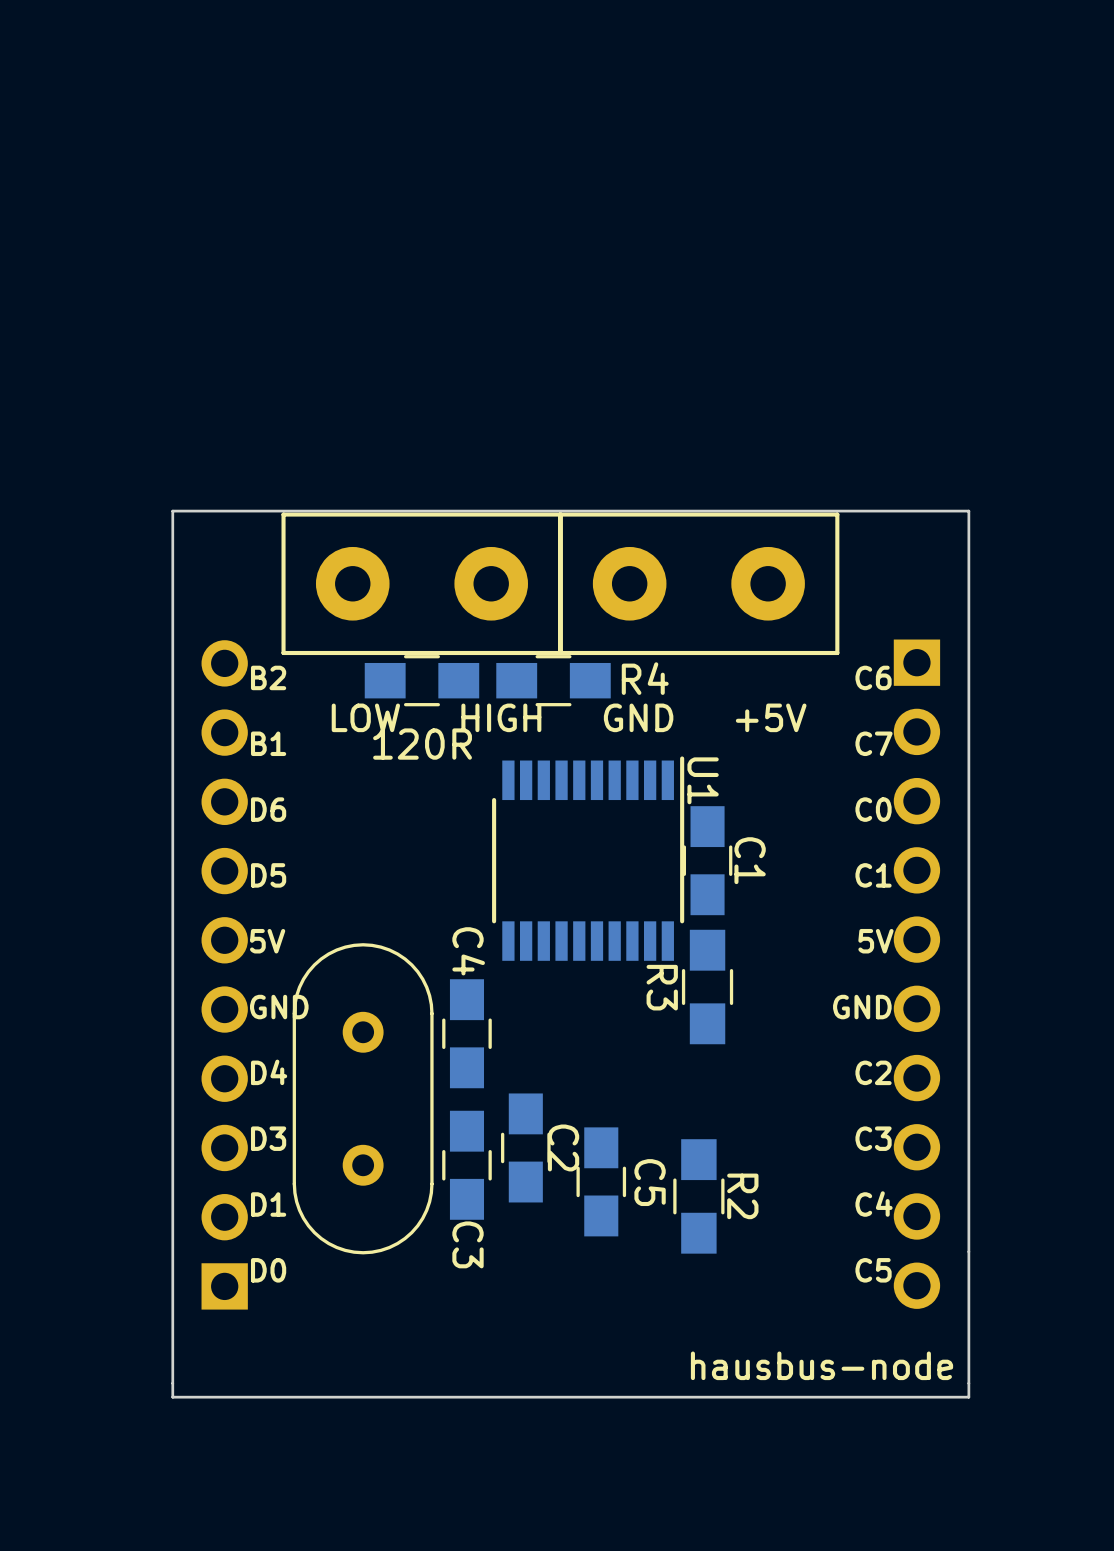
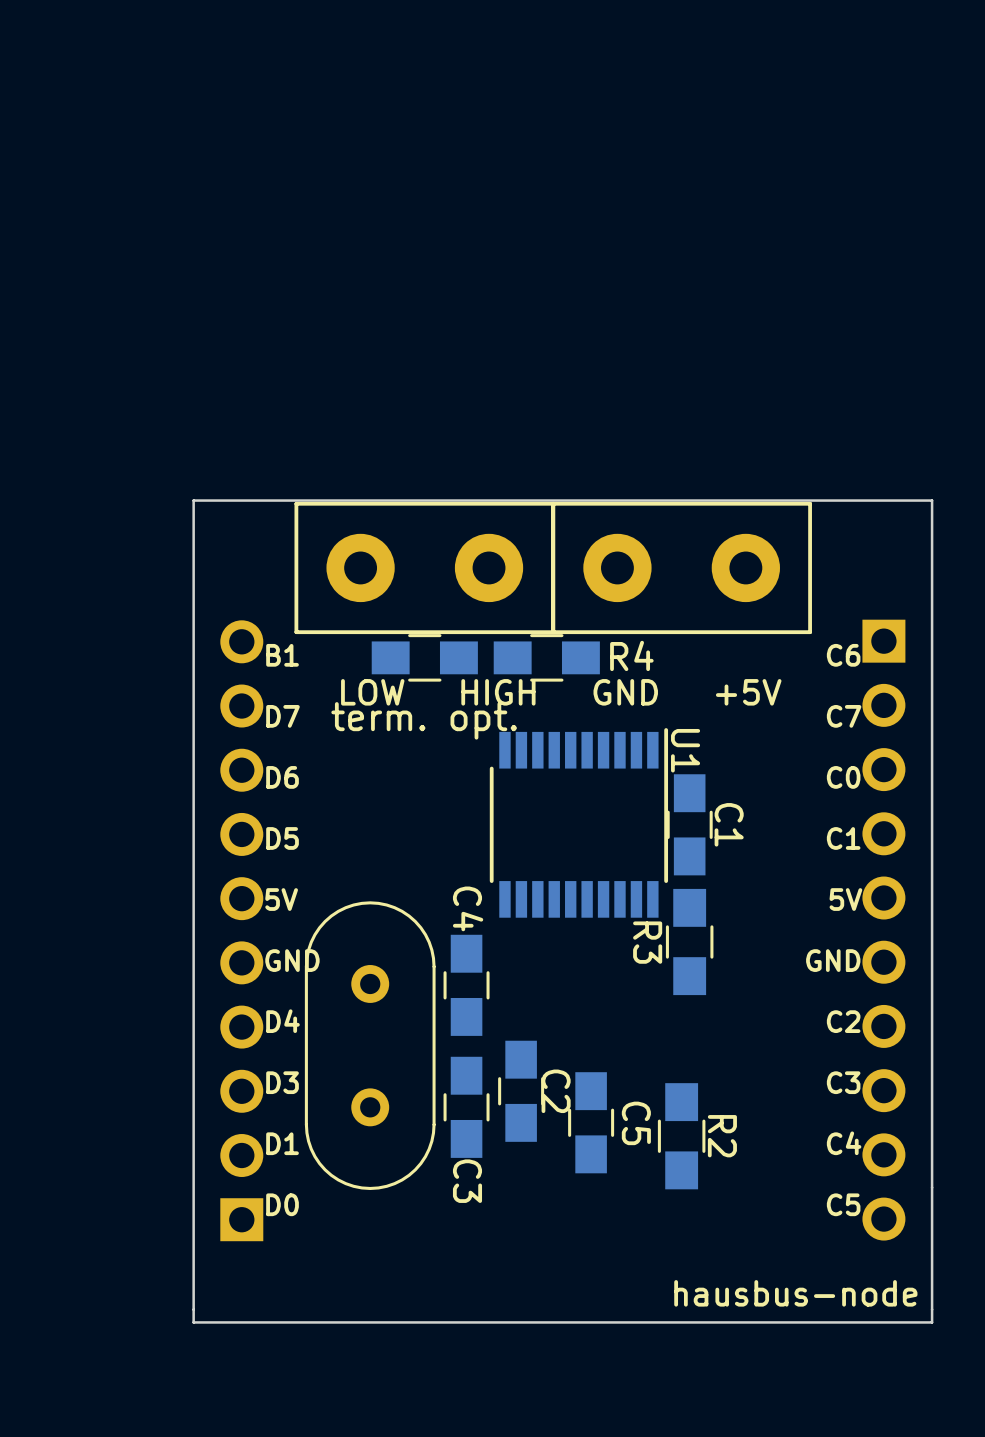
text: B2 (268, 677) -> B1 (282, 655)
text: B1 (268, 743) -> D7 (282, 716)
part value: 120R (422, 744) -> term. opt. (424, 720)

